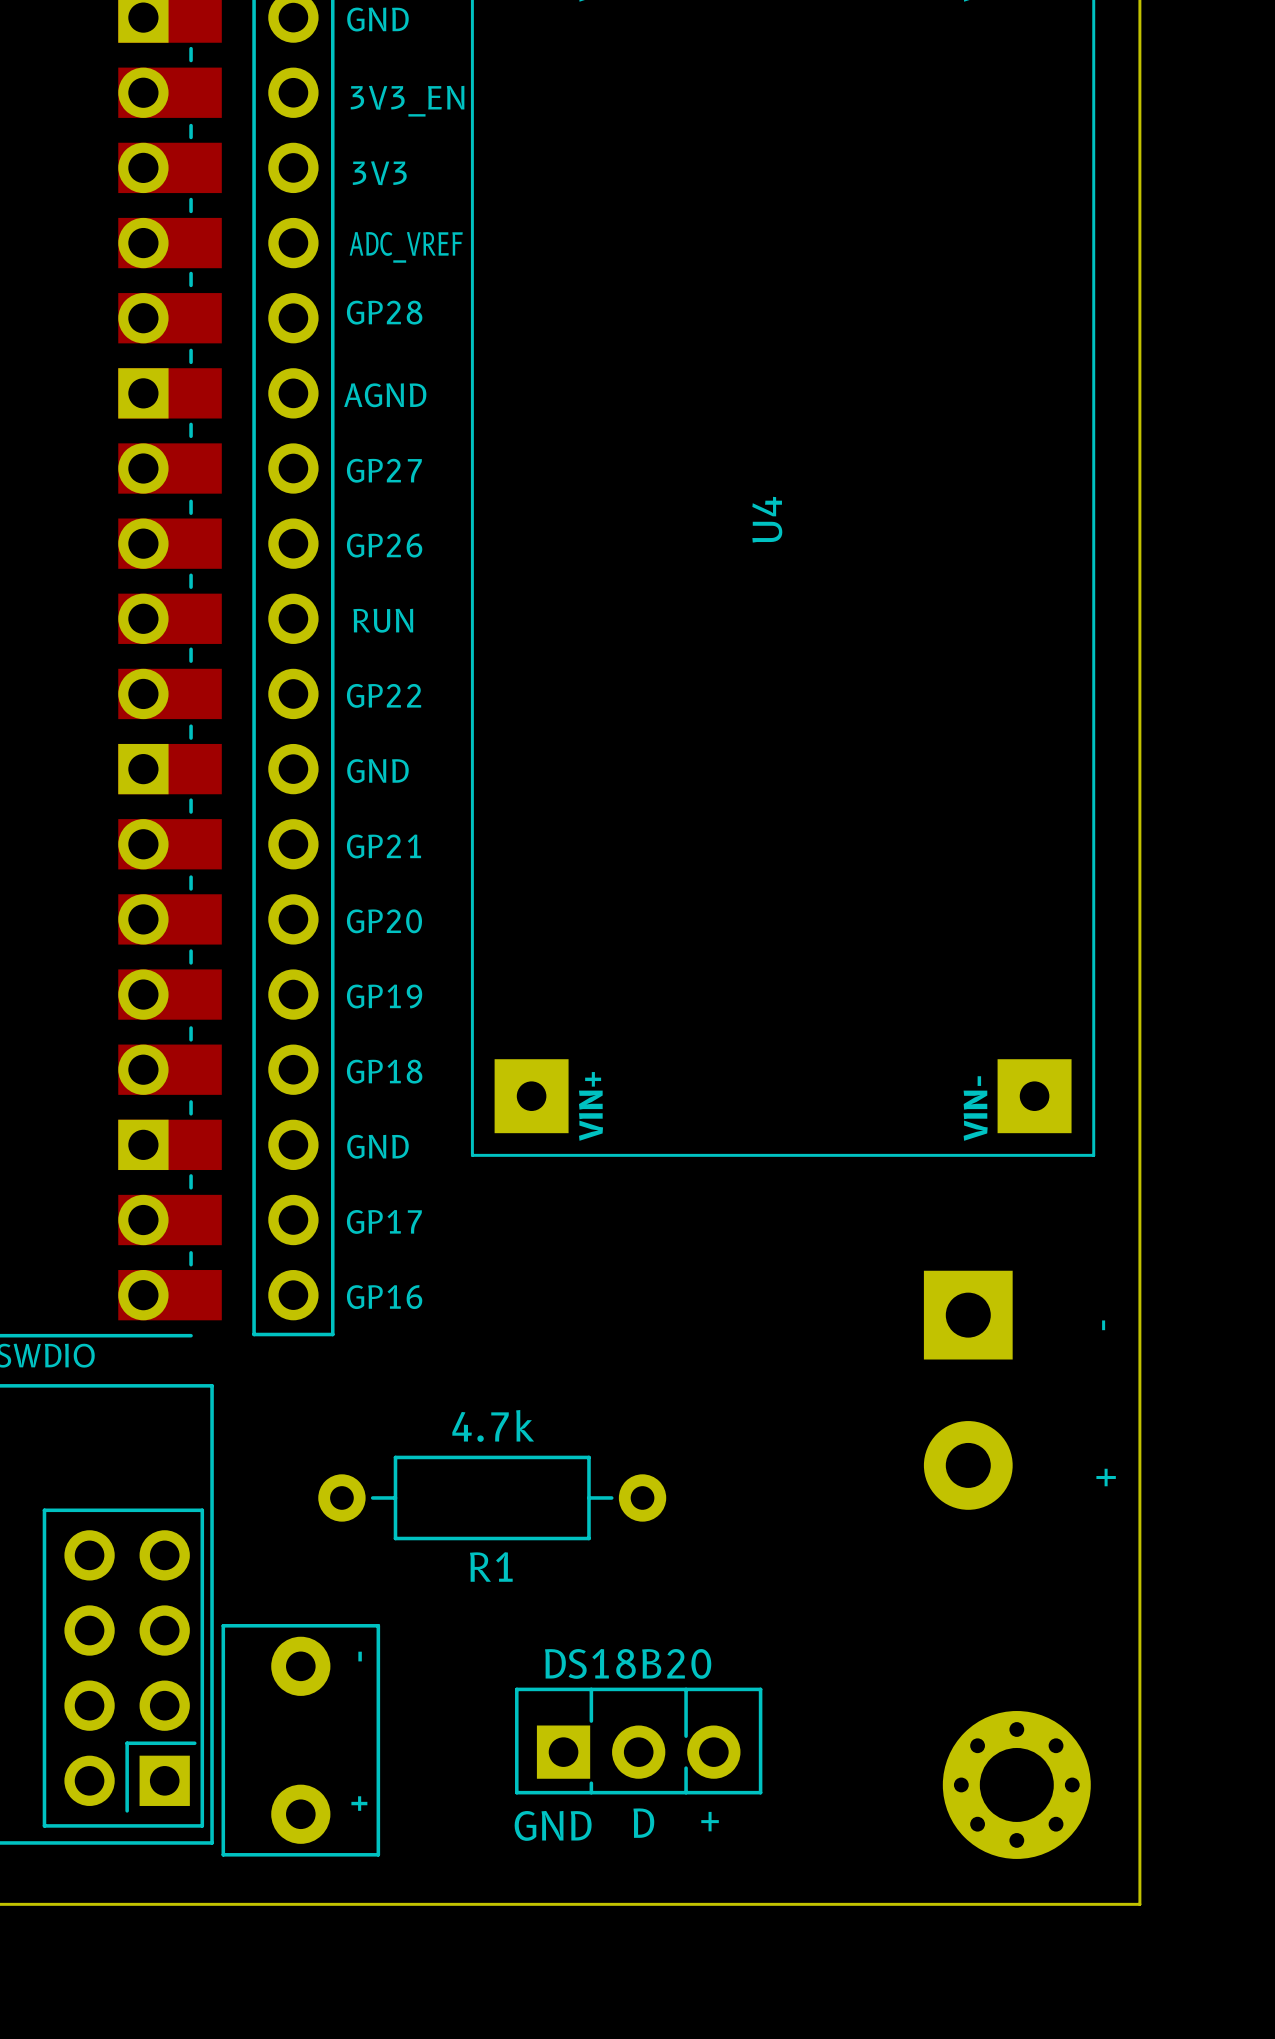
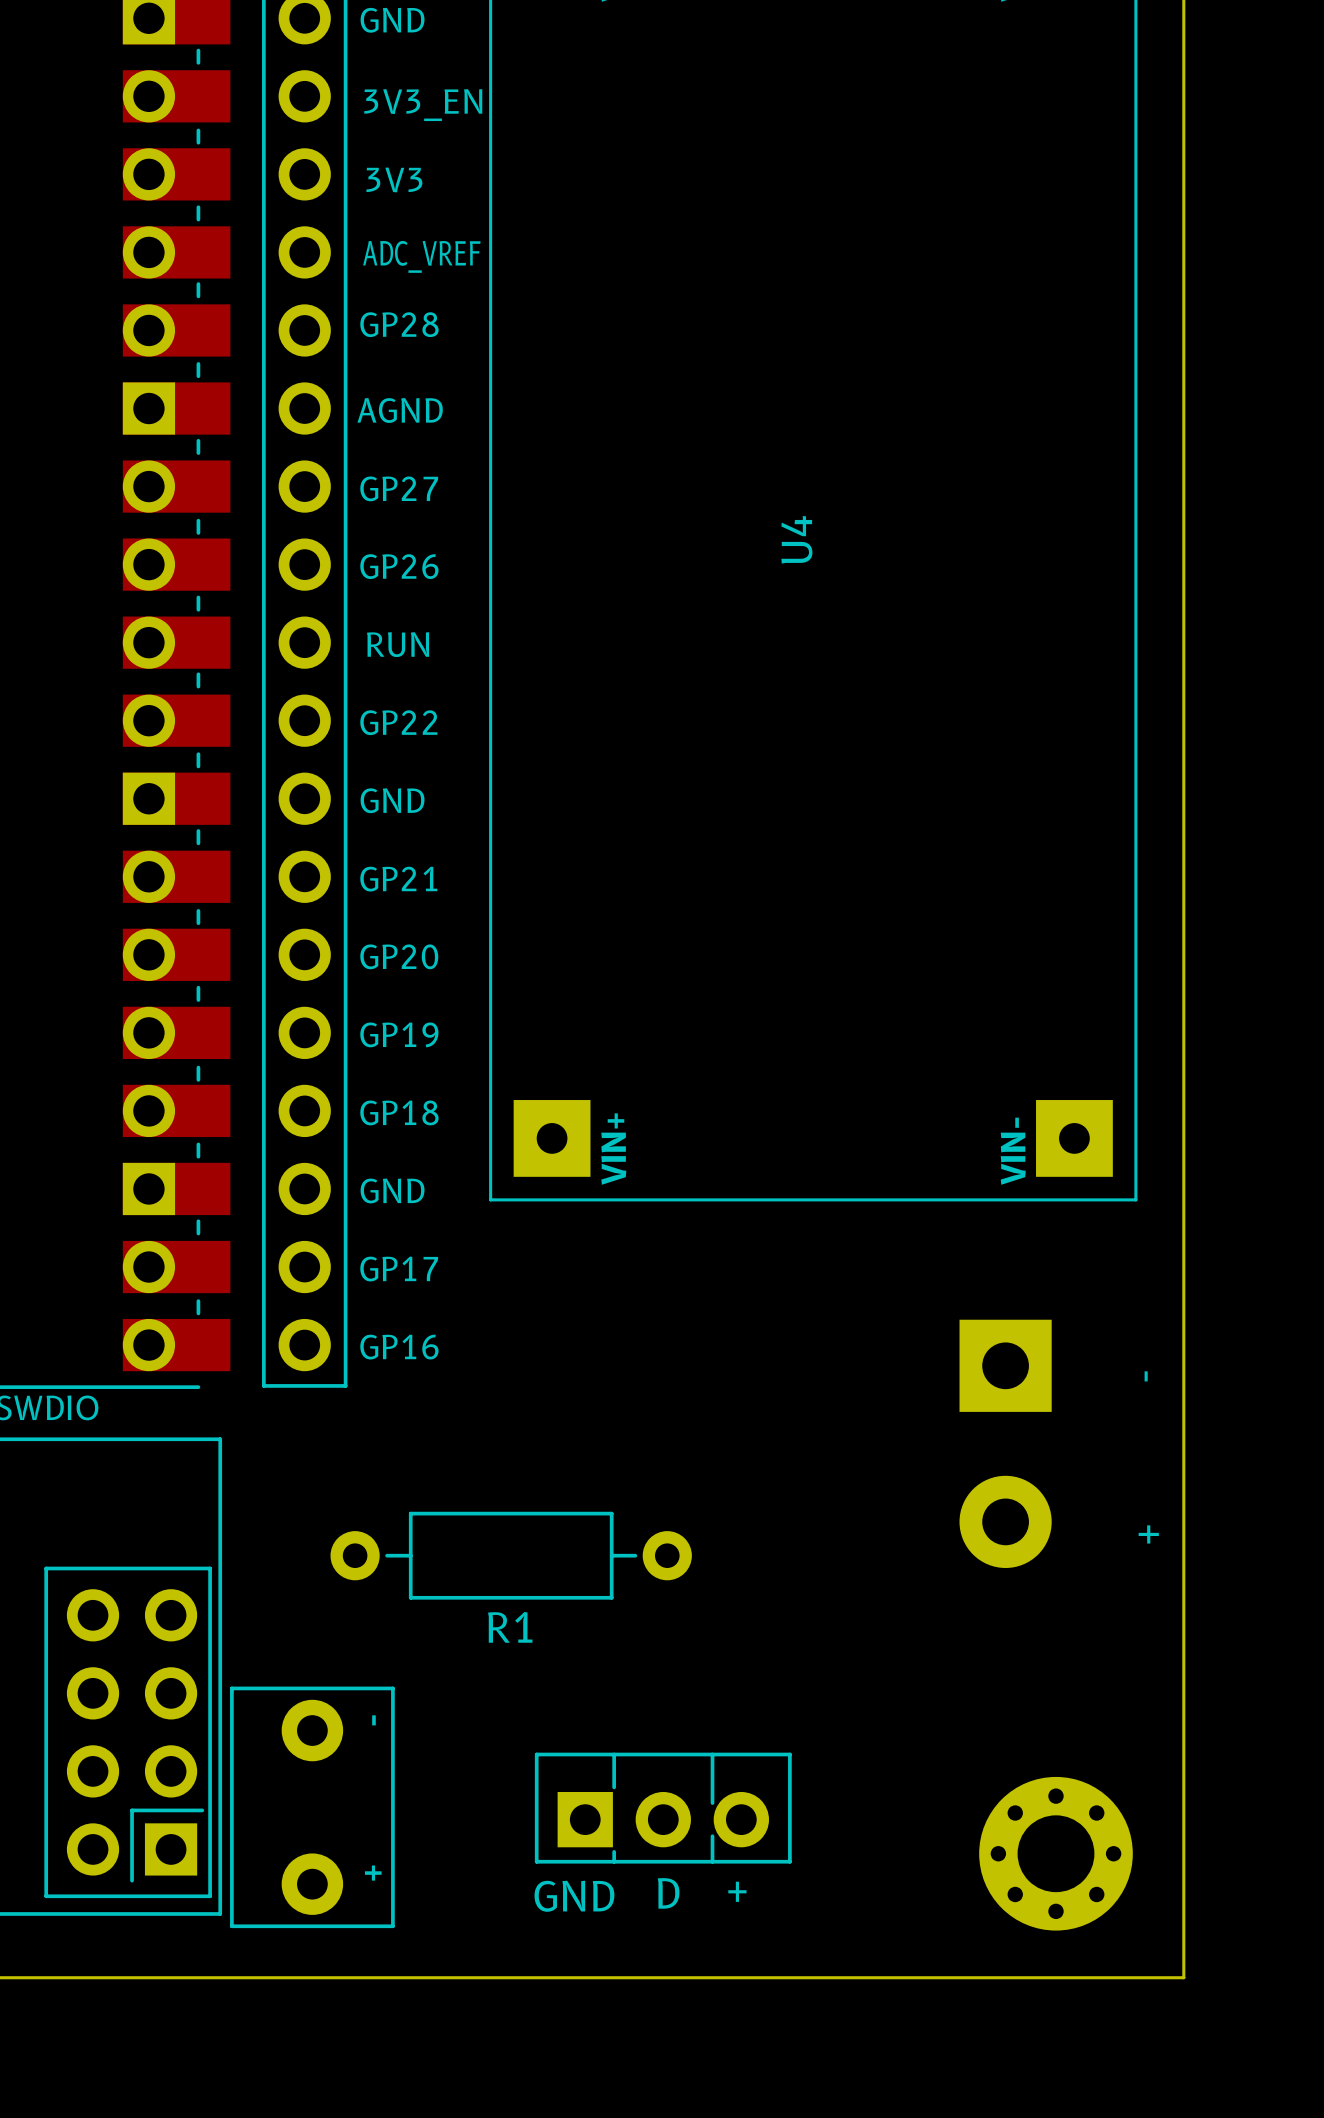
R1 value: 4.7k (493, 1425) -> none
part value: DS18B20 (628, 1663) -> none

